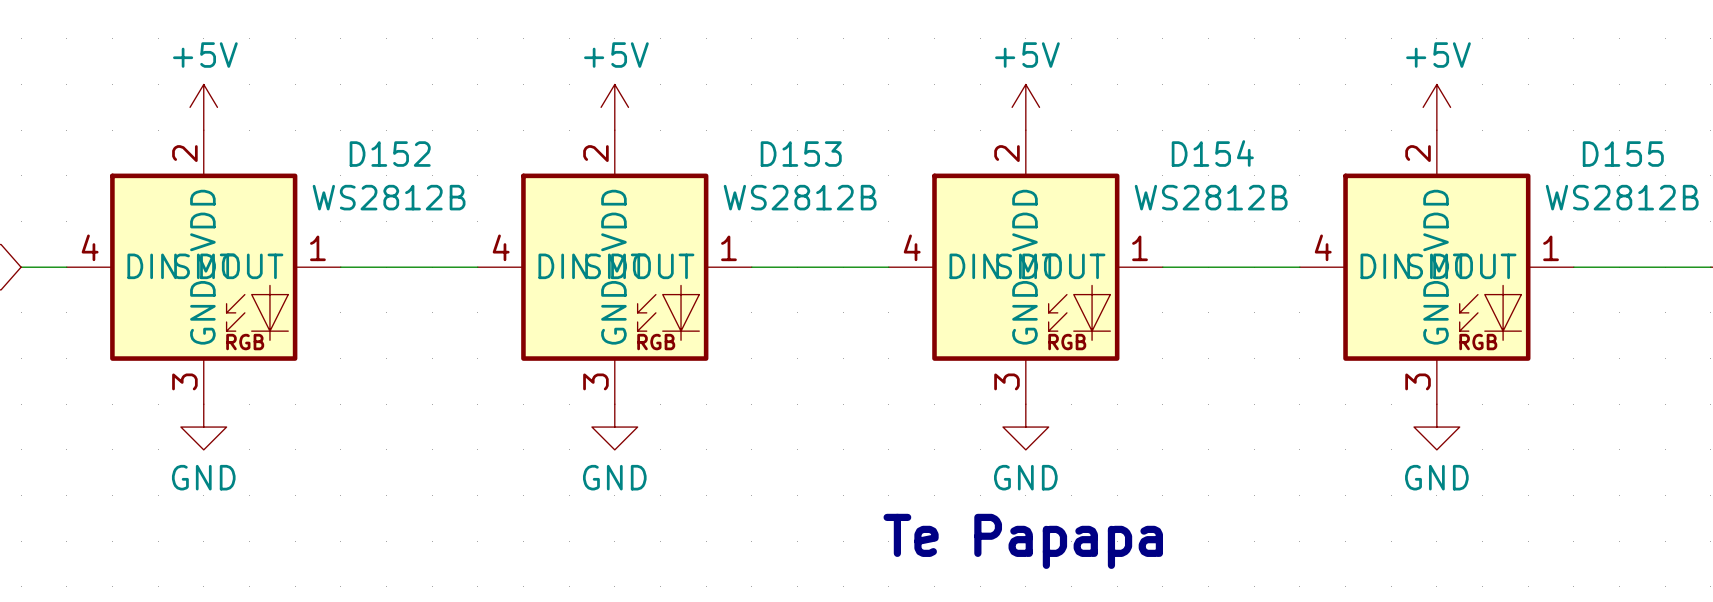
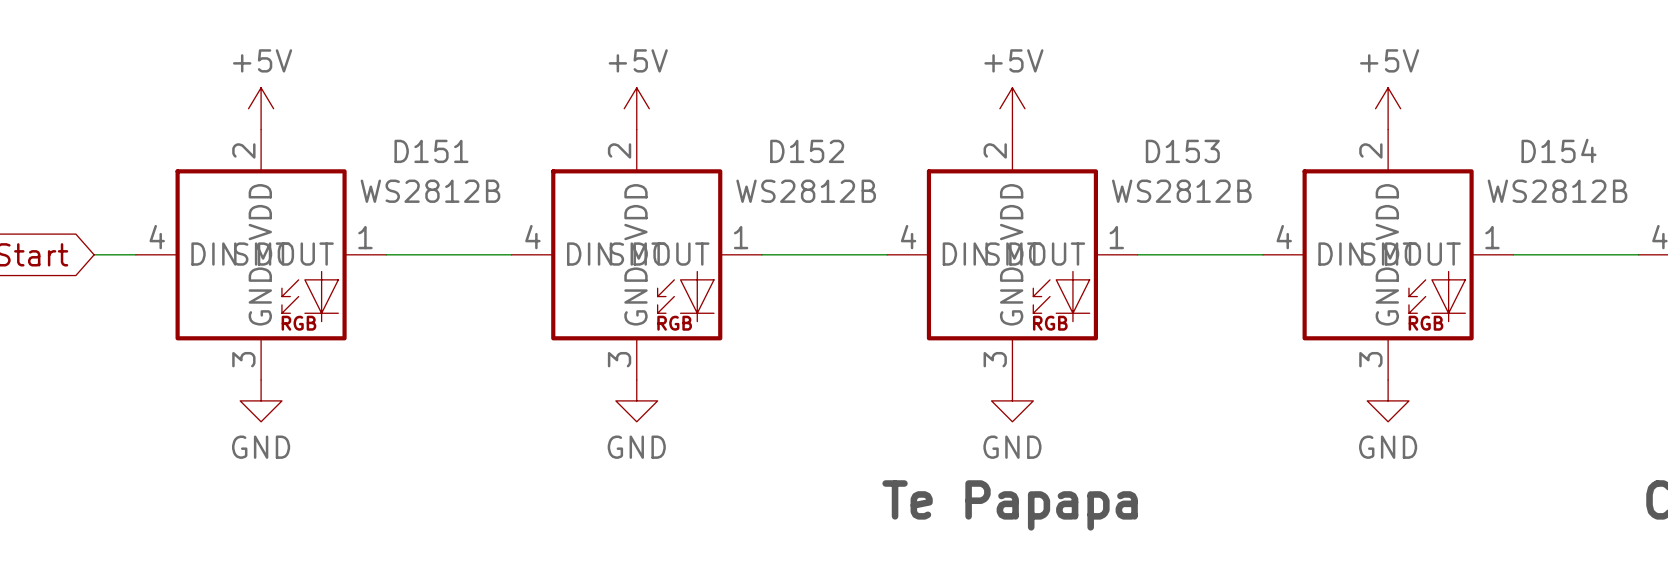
D154 name: D154 (1212, 153) -> D153 (1182, 151)
D152 name: D152 (390, 154) -> D151 (431, 151)
D153 name: D153 (801, 154) -> D152 (807, 151)
D155 name: D155 (1623, 154) -> D154 (1558, 150)

